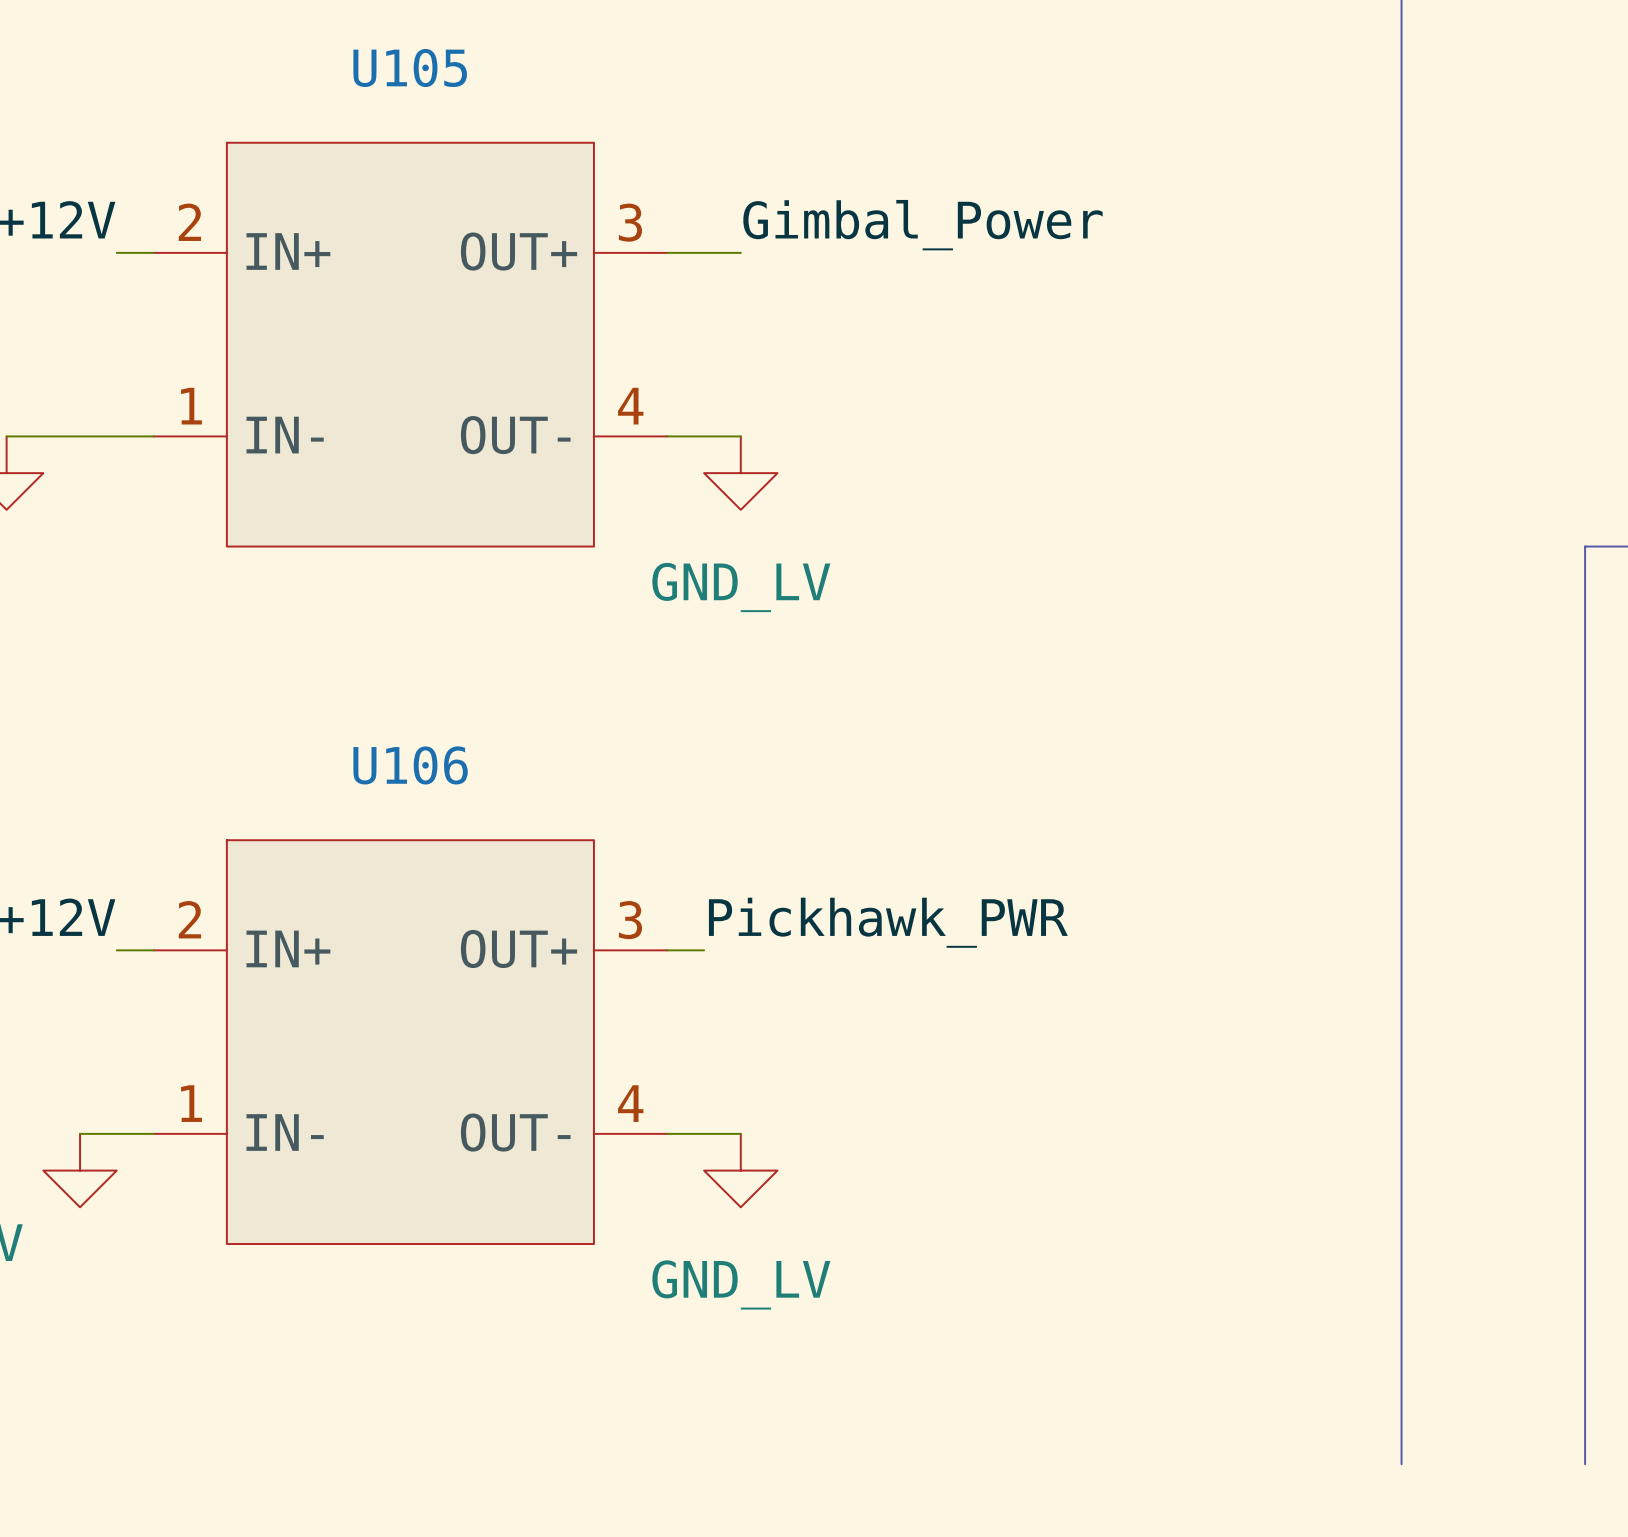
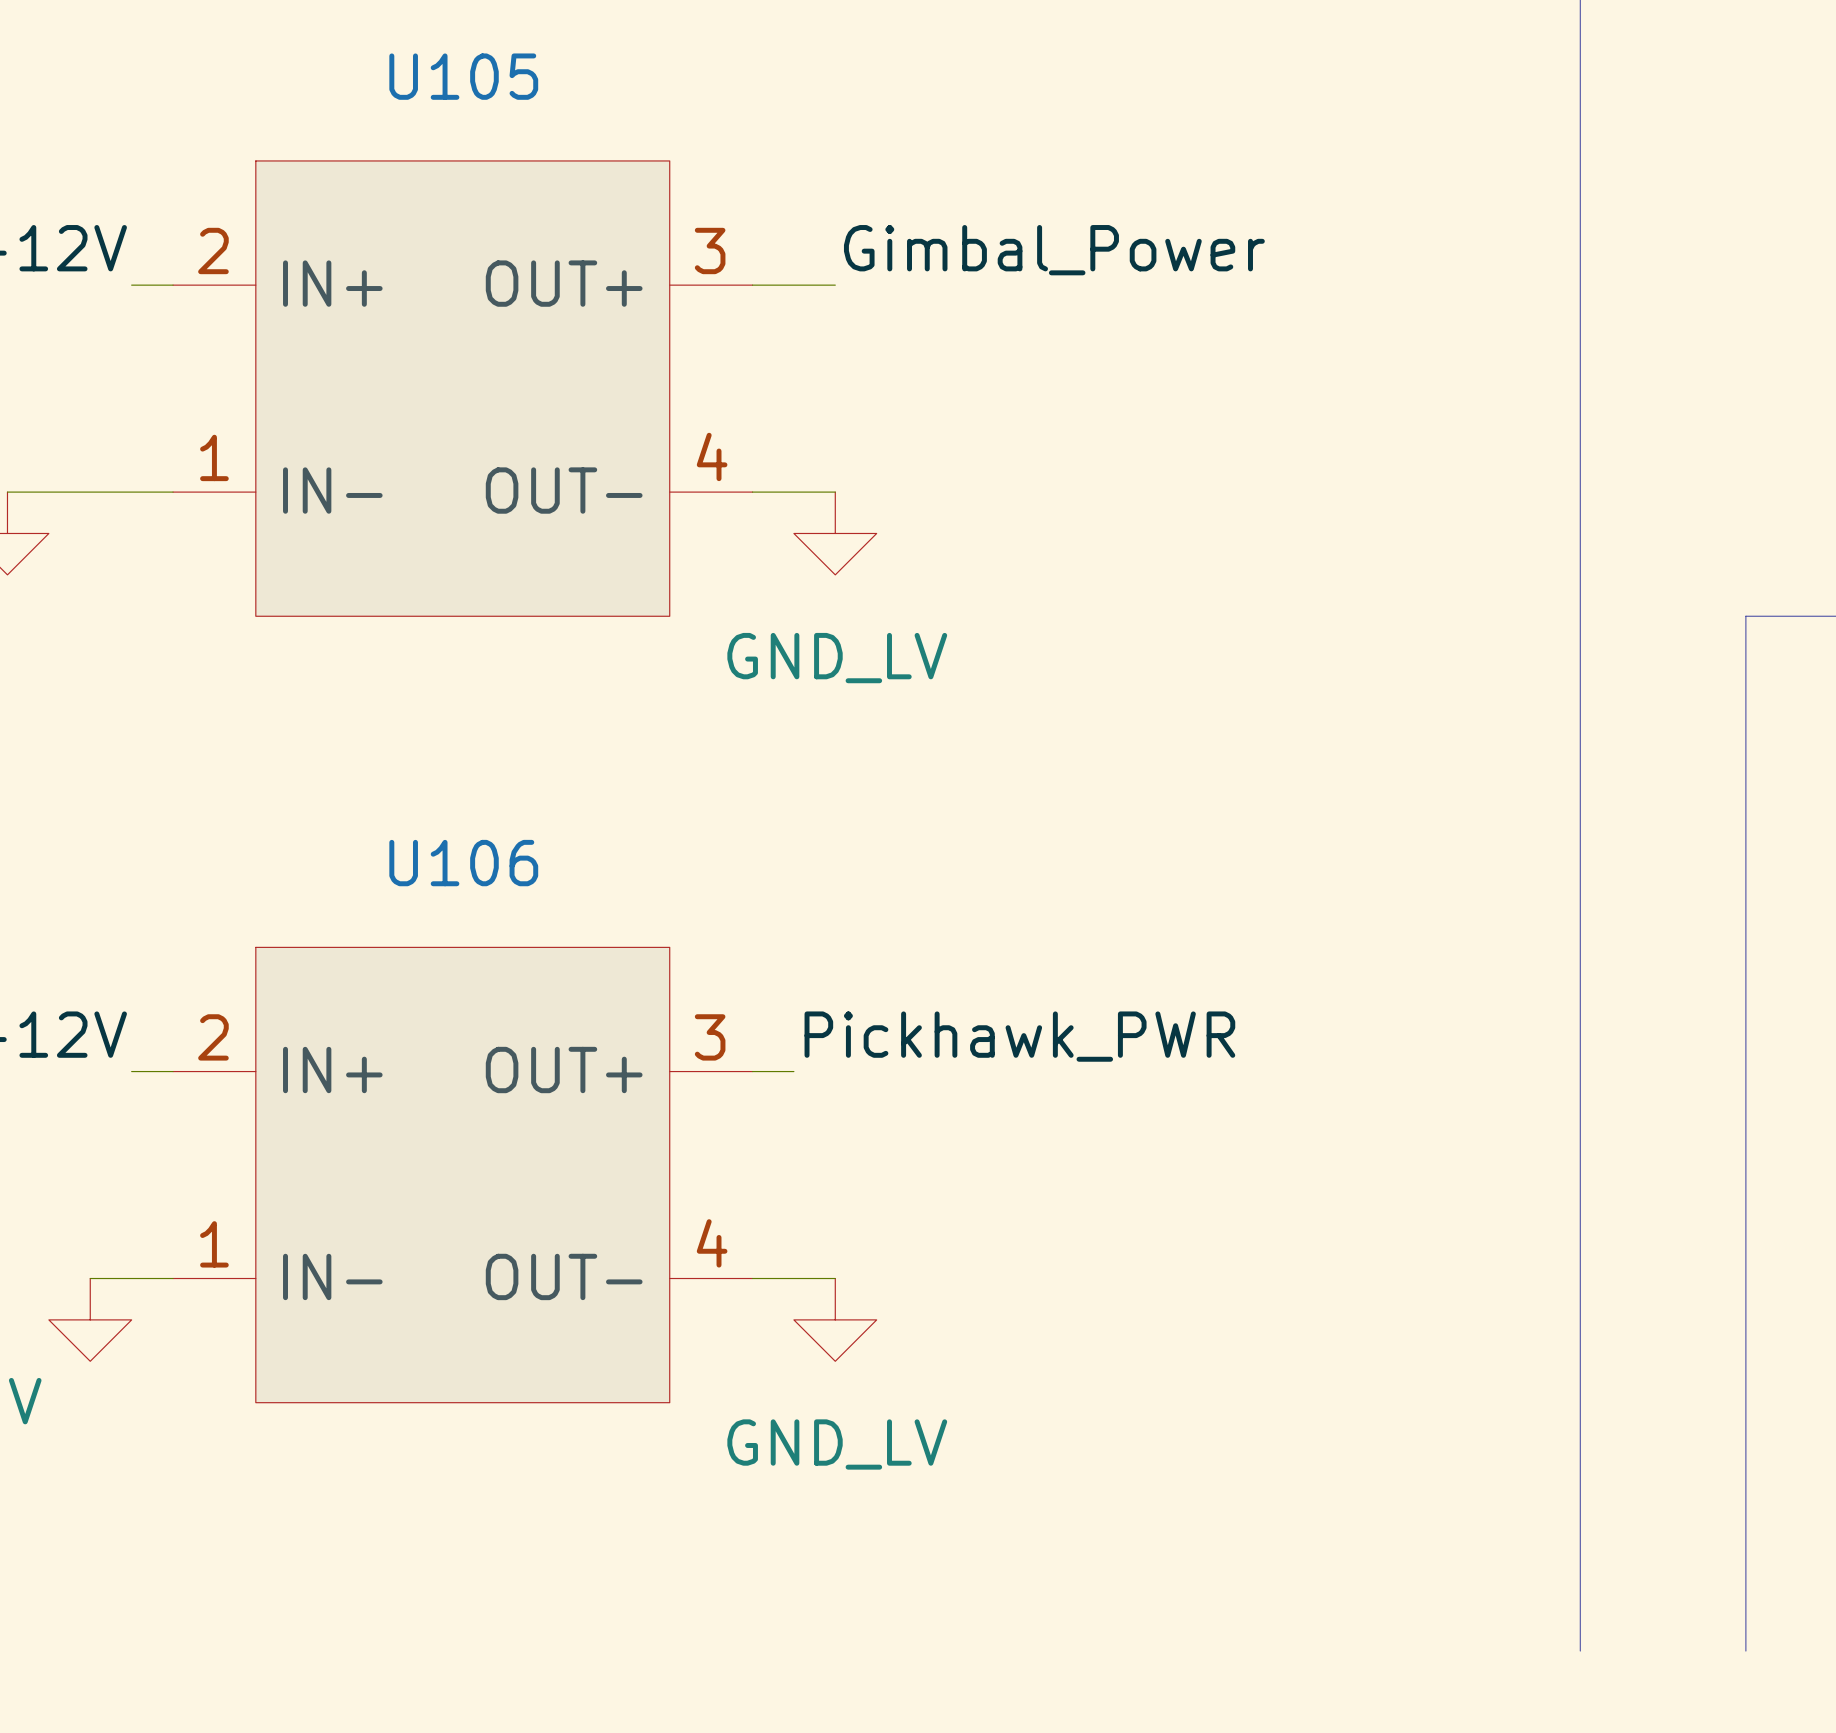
line: (1585, 546) (1585, 1464) -> (1787, 616) (1745, 616) (1745, 1651)

